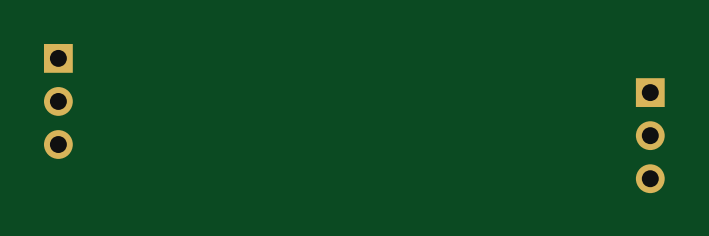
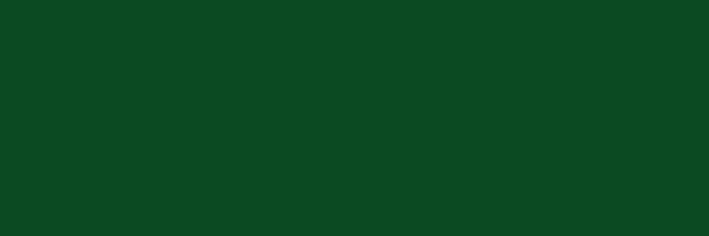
part: (58, 101) -> none
part: (650, 135) -> none

